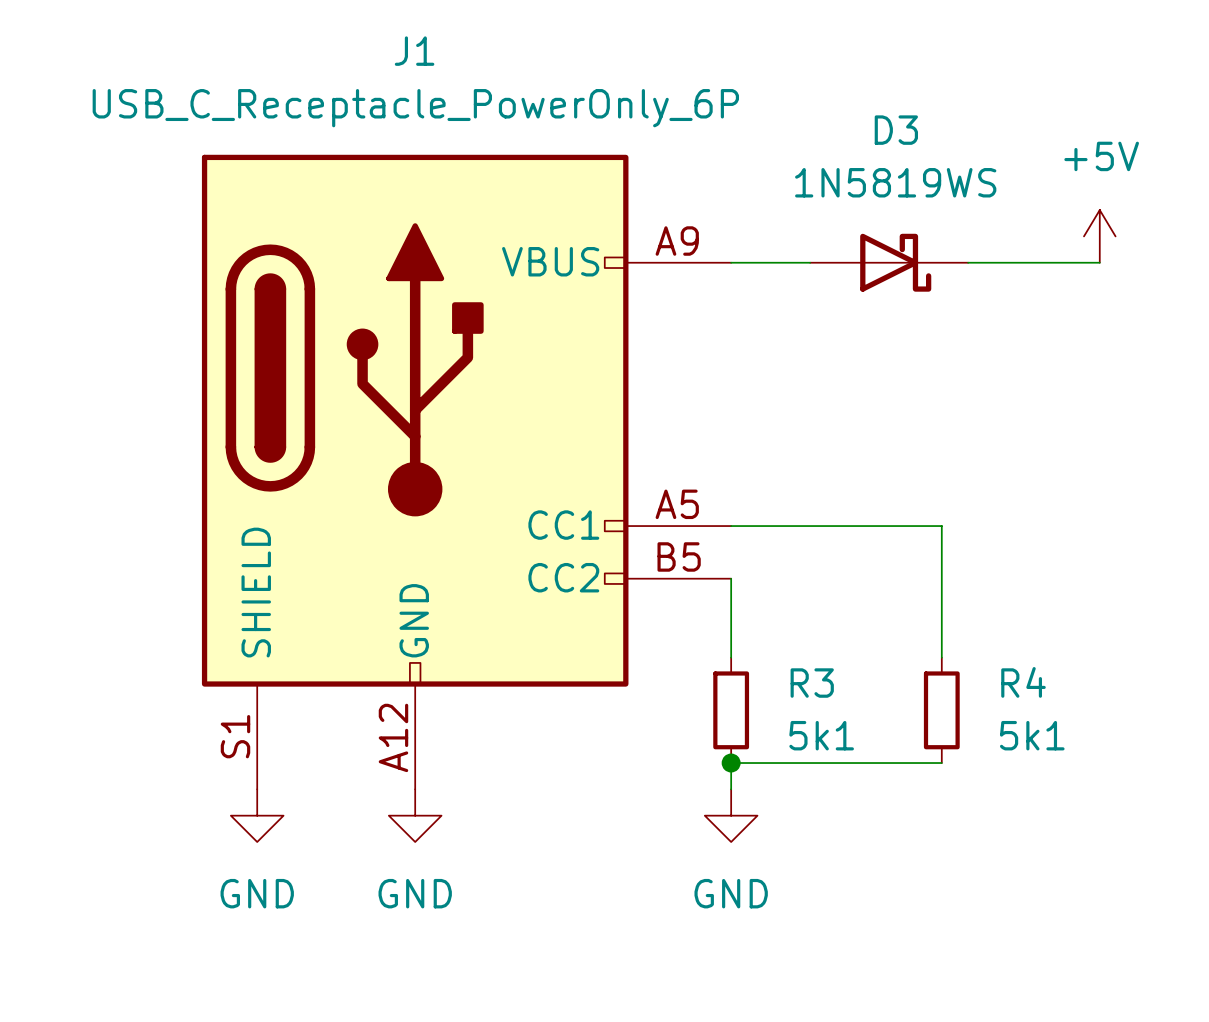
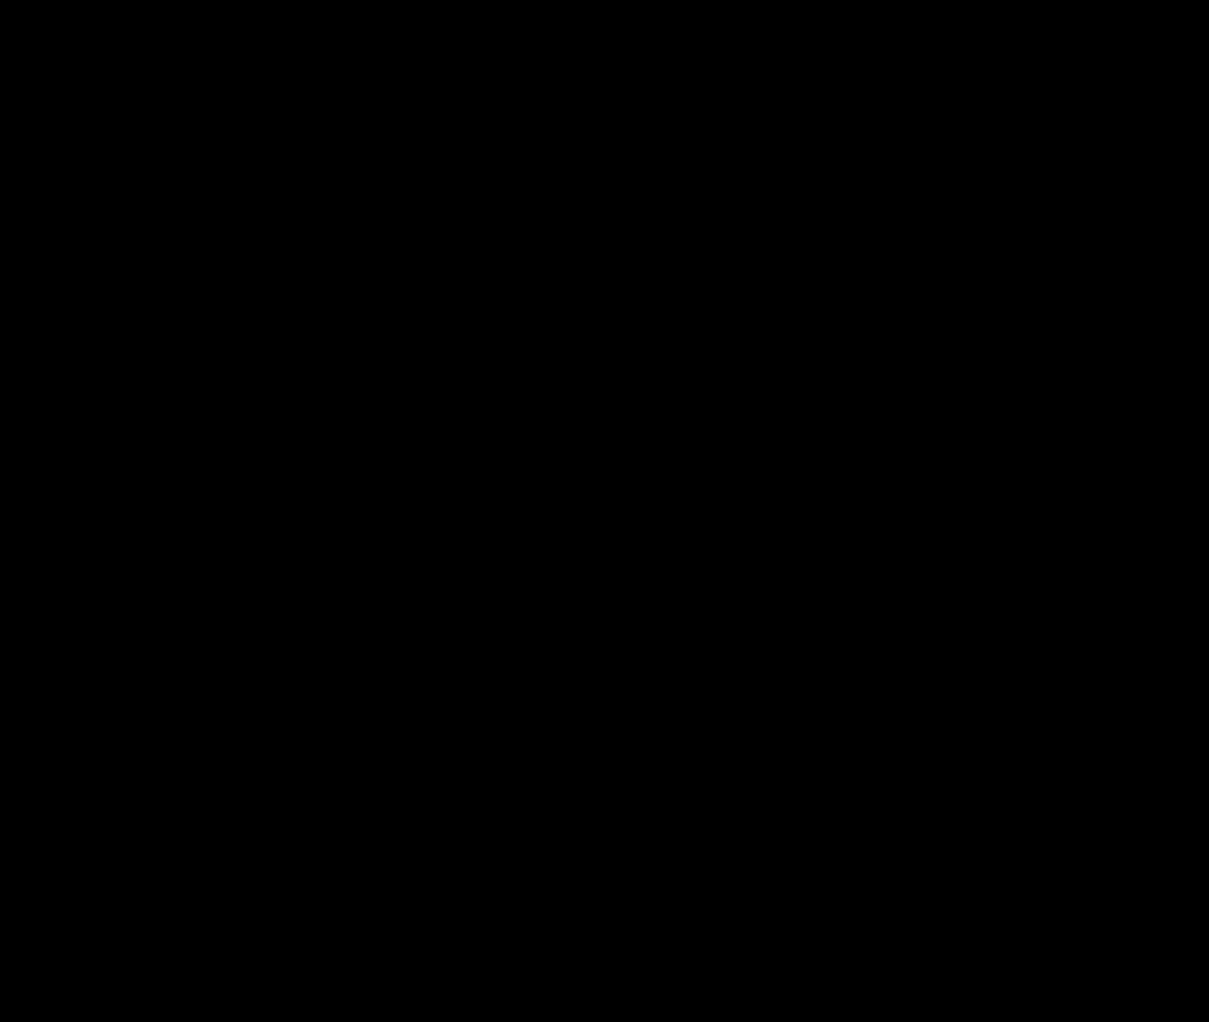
power symbol: +5V (1099, 236) -> none
wire: (731, 262) (810, 262) -> none
D3: 1N5819WS (889, 262) -> none
wire: (968, 262) (1099, 262) -> none
J1: USB_C_Receptacle_PowerOnly_6P (466, 472) -> none
wire: (731, 526) (941, 526) (941, 657) -> none
wire: (731, 578) (731, 657) -> none
R3: 5k1 (731, 710) -> none
R4: 5k1 (941, 710) -> none
junction: (731, 763) -> none
wire: (941, 763) (731, 763) (731, 789) -> none
power symbol: GND (257, 815) -> none
power symbol: GND (415, 815) -> none
power symbol: GND (731, 815) -> none

